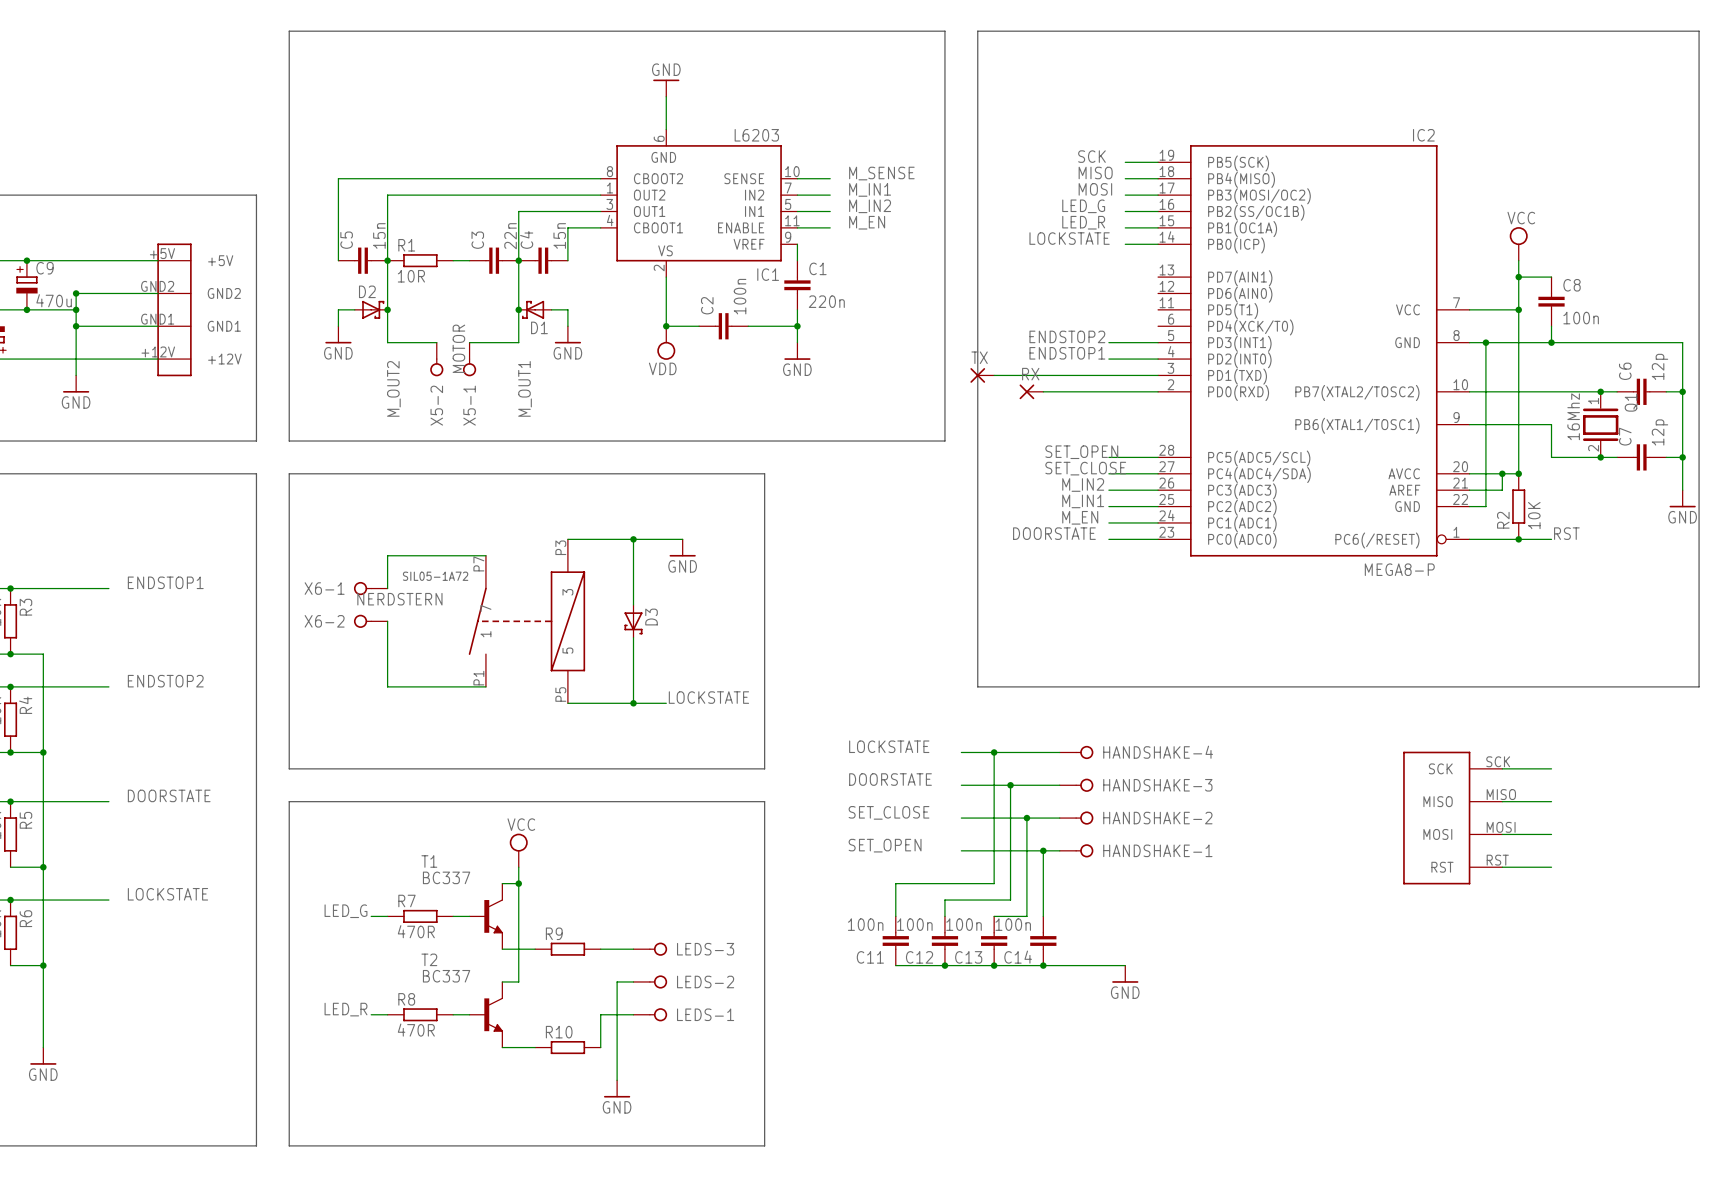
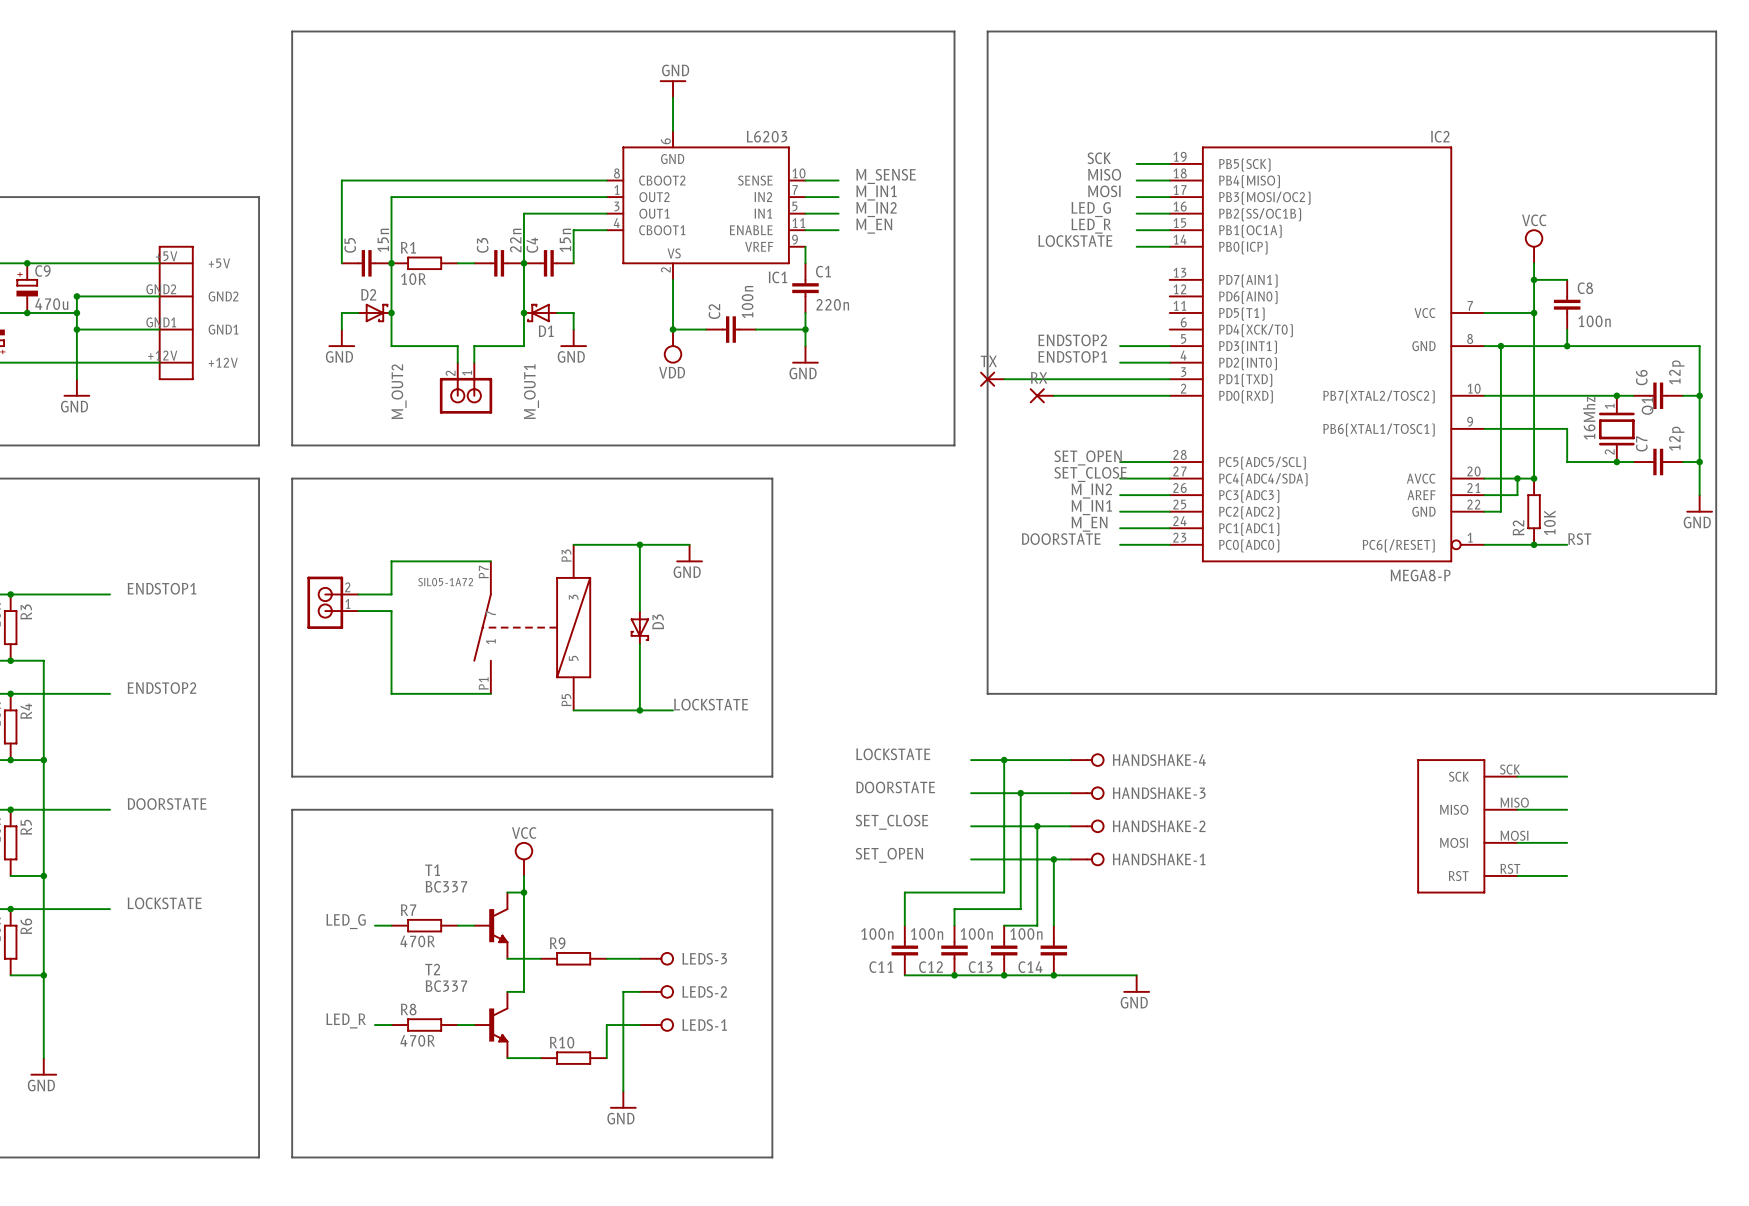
wire: none -> (441, 346) (457, 346) (457, 362)
X5-2: MOTOR (436, 359) -> none
X5-1: (469, 359) -> none
part: none -> (466, 388)
X6-1: (370, 588) -> none
part: none -> (332, 602)
wire: none -> (358, 611) (391, 611) (391, 627)
X6-2: NERDSTERN (370, 621) -> none

